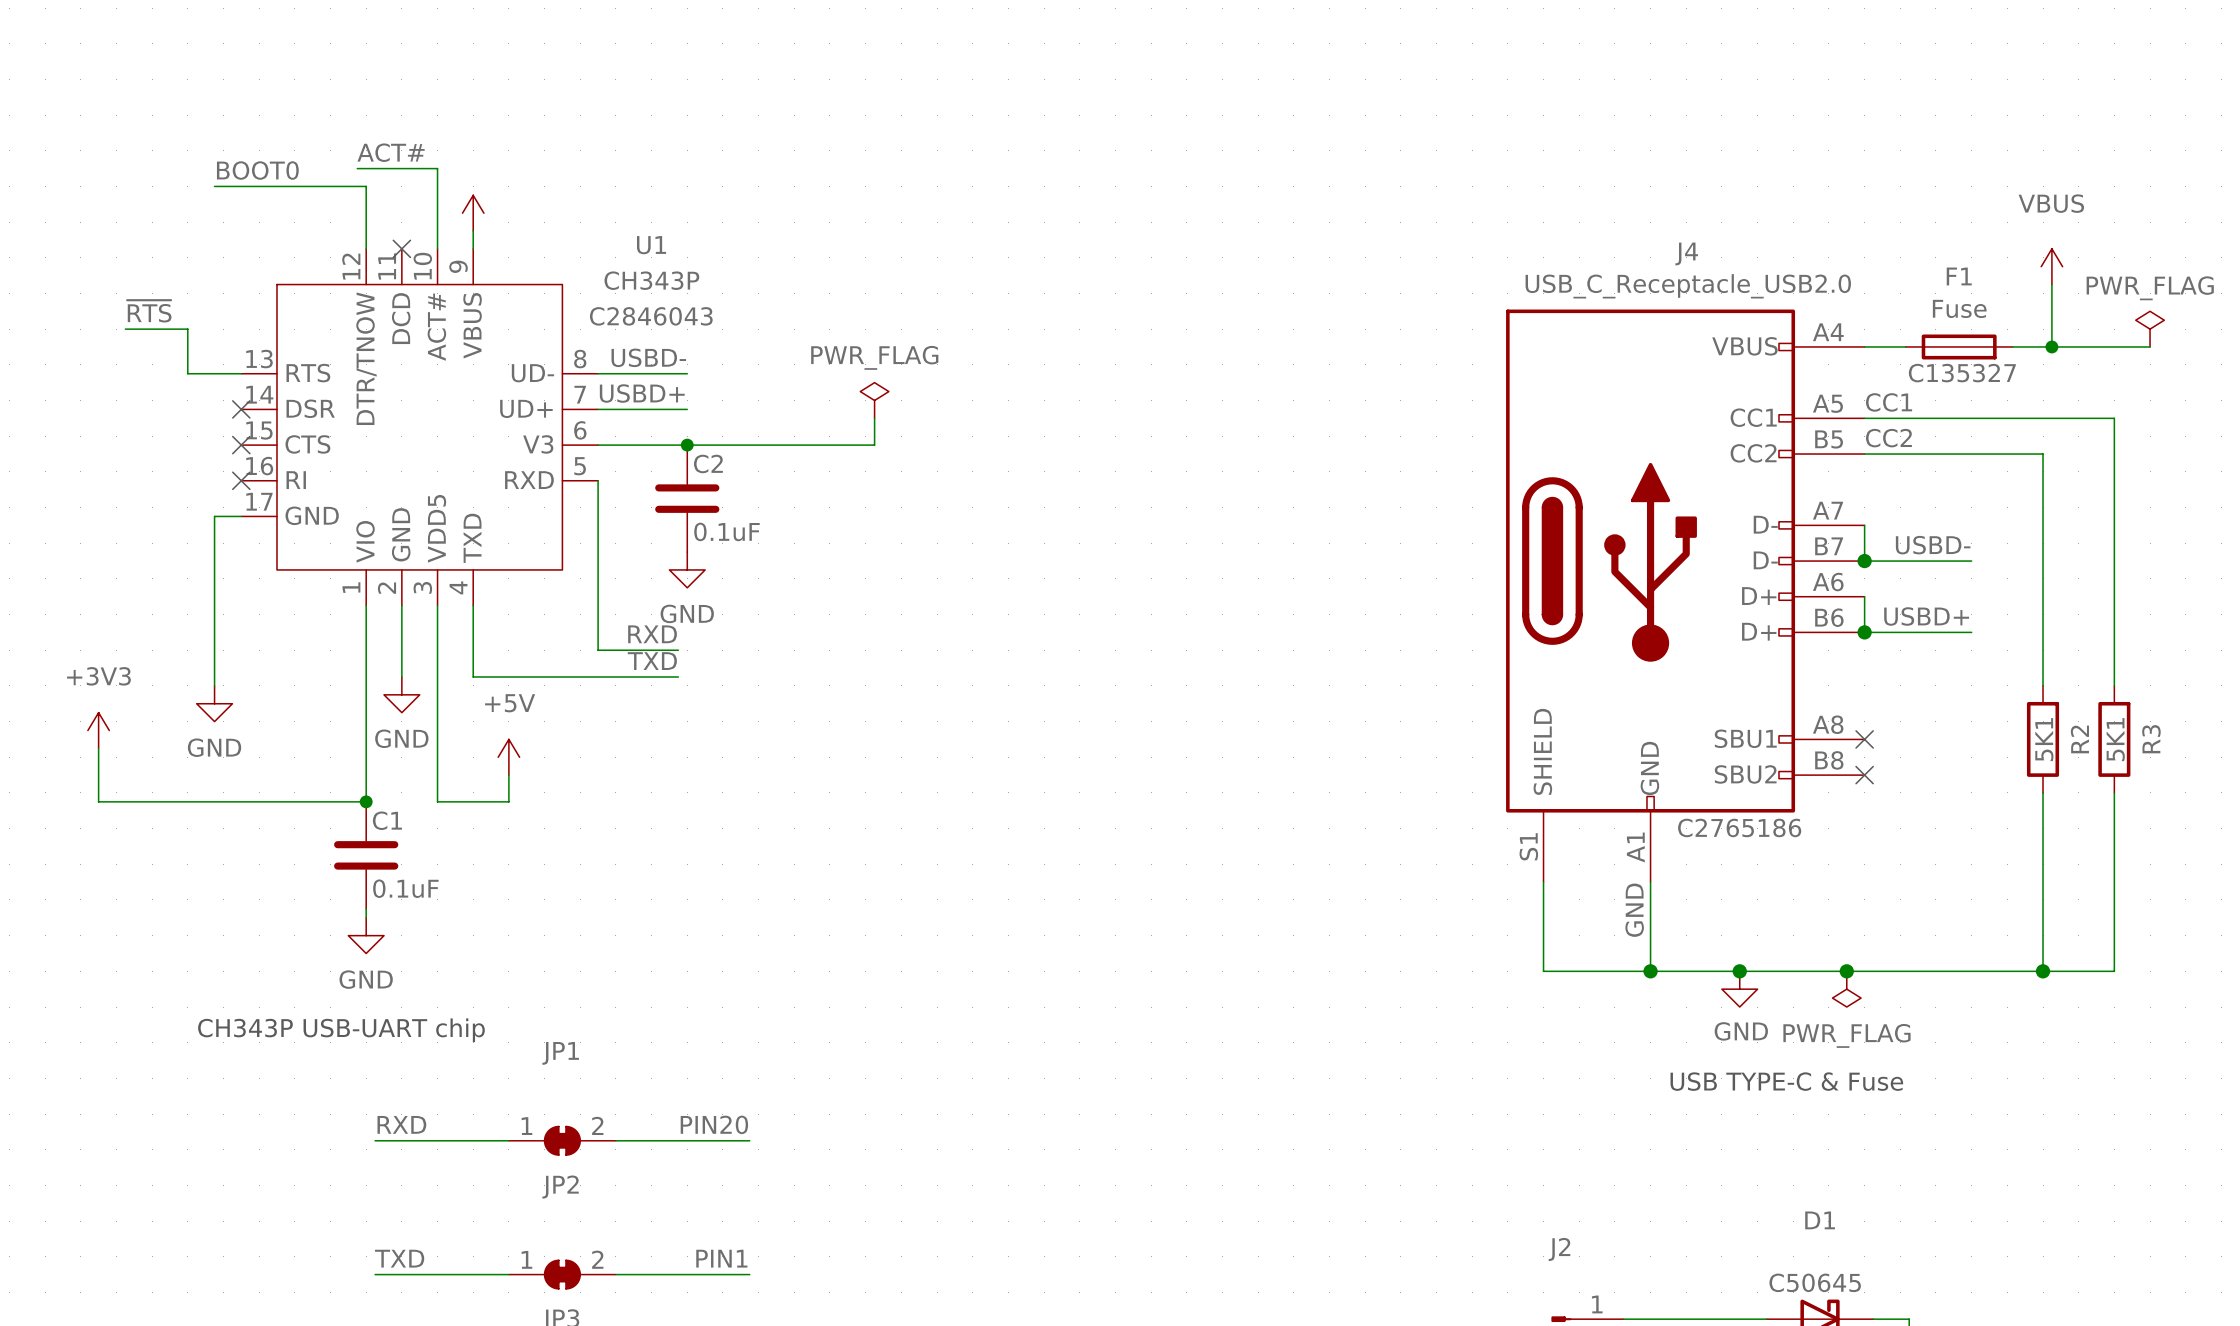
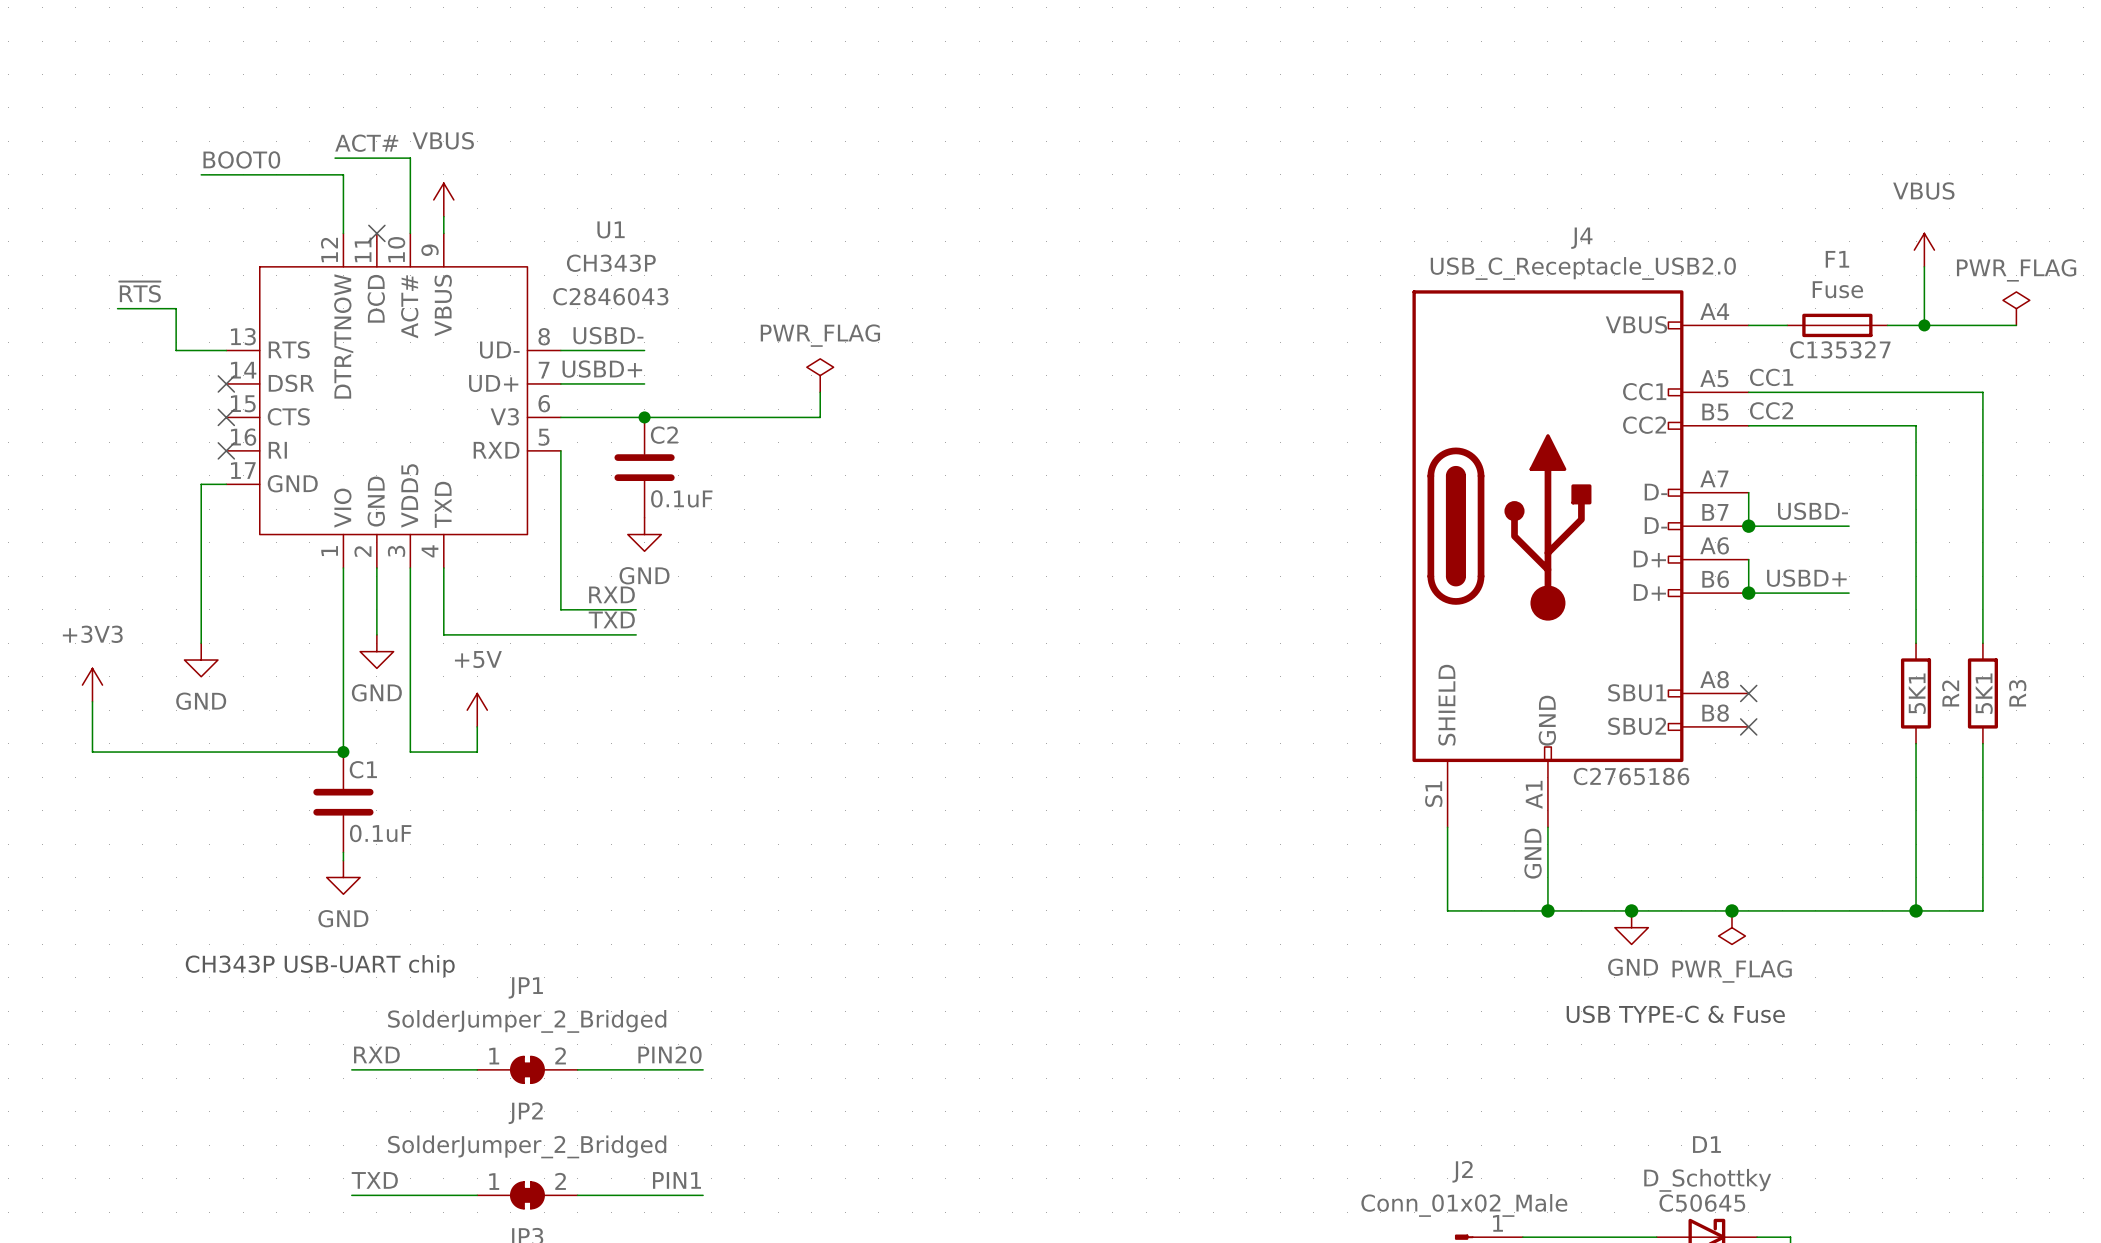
power symbol text: none -> VBUS (443, 140)
JP1 value: none -> SolderJumper_2_Bridged (527, 1021)
JP2 value: none -> SolderJumper_2_Bridged (527, 1146)
D1 value: none -> D_Schottky (1707, 1180)
J2 value: none -> Conn_01x02_Male (1464, 1205)

